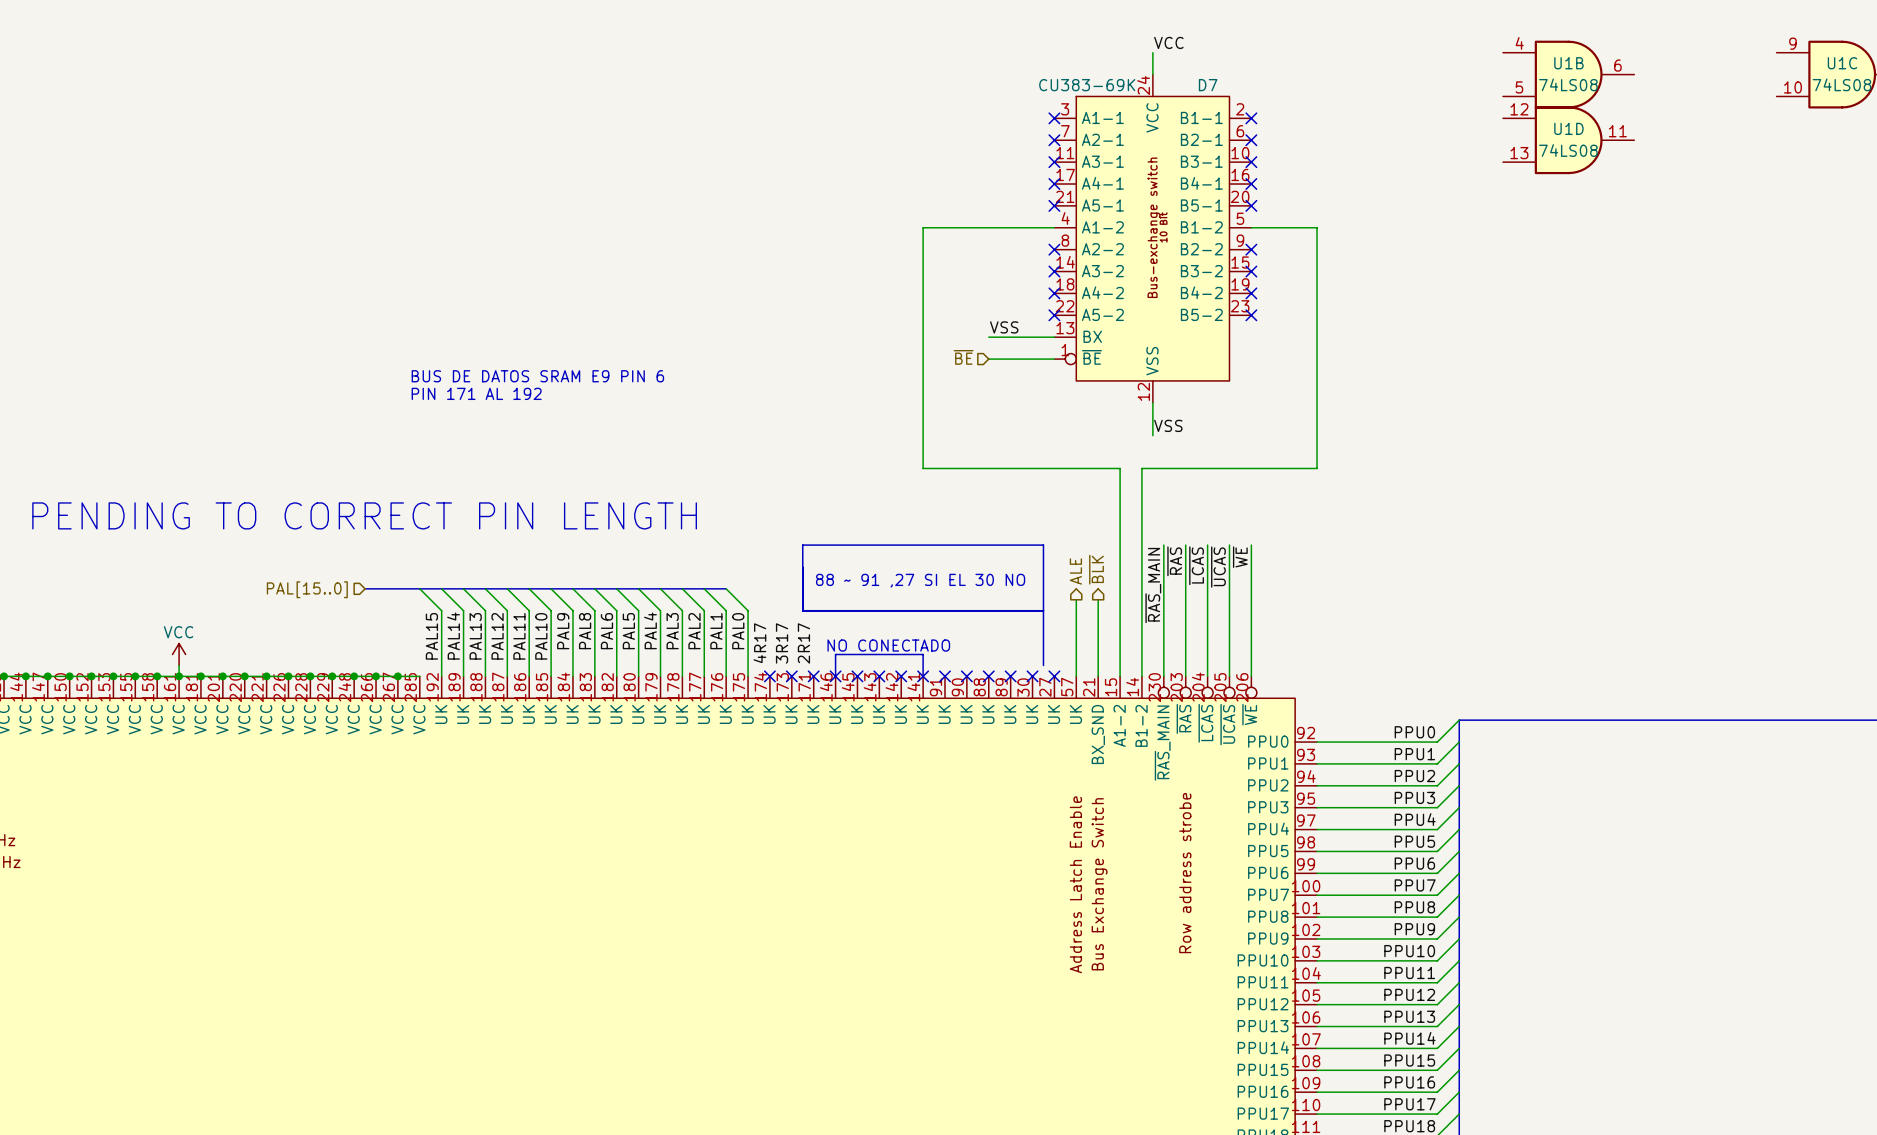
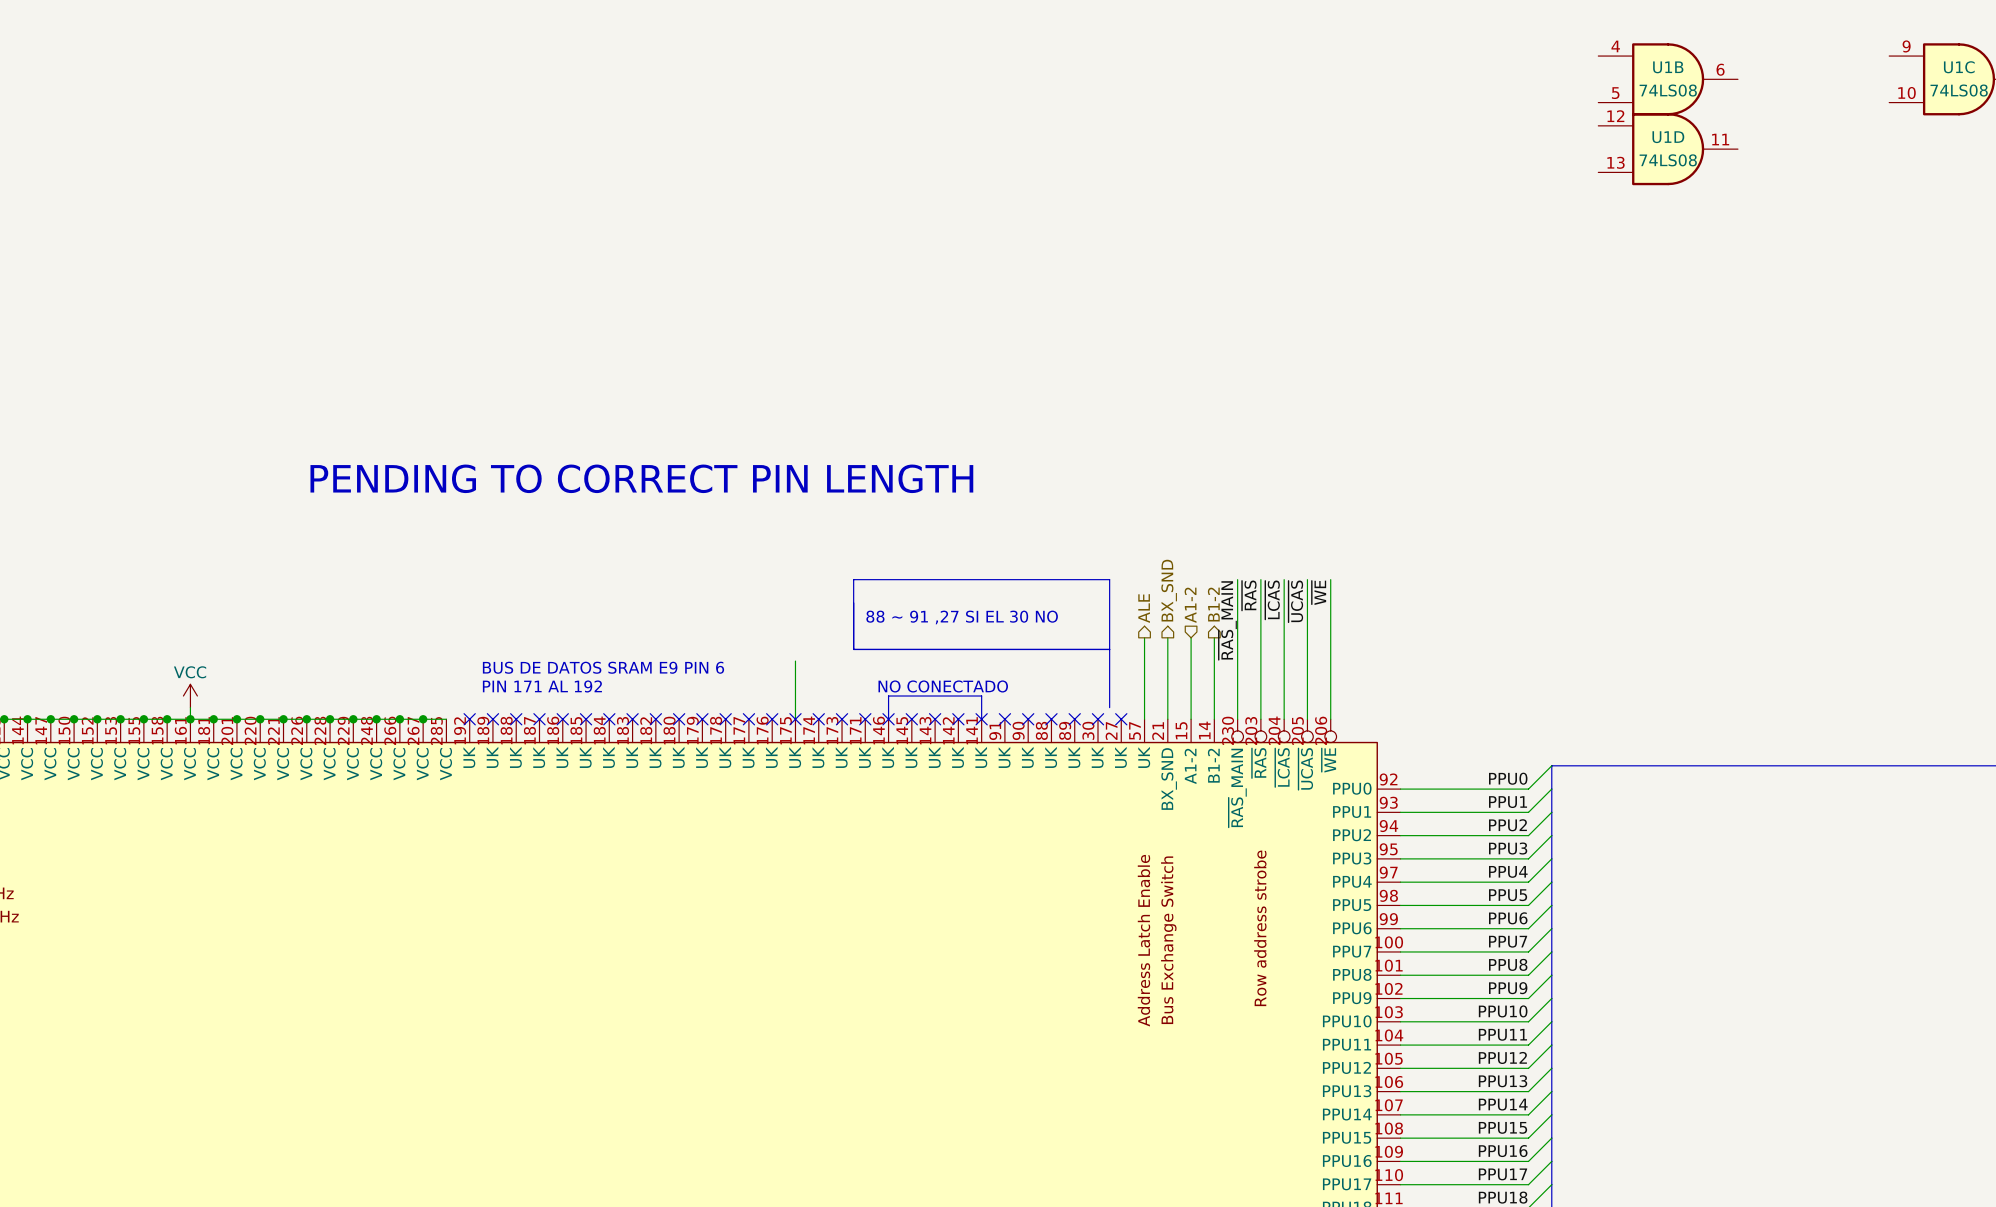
label: VCC (1168, 42) -> none
wire: (1152, 52) (1152, 74) -> none
no-connect mark: (1054, 118) -> none
no-connect mark: (1251, 118) -> none
no-connect mark: (1054, 140) -> none
no-connect mark: (1251, 140) -> none
no-connect mark: (1054, 162) -> none
no-connect mark: (1251, 162) -> none
no-connect mark: (1054, 184) -> none
no-connect mark: (1251, 184) -> none
no-connect mark: (1054, 205) -> none
no-connect mark: (1251, 205) -> none
wire: (1054, 227) (923, 227) (923, 468) (1120, 468) (1120, 599) -> none
wire: (1251, 227) (1317, 227) (1317, 468) (1141, 468) (1141, 599) -> none
D7: CU383-69K (1152, 238) -> none
no-connect mark: (1054, 249) -> none
no-connect mark: (1251, 249) -> none
no-connect mark: (1054, 271) -> none
no-connect mark: (1251, 271) -> none
no-connect mark: (1054, 293) -> none
no-connect mark: (1251, 293) -> none
no-connect mark: (1054, 315) -> none
no-connect mark: (1251, 315) -> none
label: VSS (1004, 327) -> none
wire: (988, 337) (1054, 337) -> none
hierarchical label: ~{BE} (963, 357) -> none
wire: (988, 359) (1054, 359) -> none
text: BUS DE DATOS SRAM E9 PIN 6 (537, 376) -> none
text: PIN 171 AL 192 (476, 393) -> none
wire: (1152, 402) (1152, 435) -> none
label: VSS (1168, 425) -> none
text: none -> PENDING TO CORRECT PIN LENGTH (641, 478)
text: PENDING TO CORRECT PIN LENGTH (364, 515) -> none
hierarchical label: none -> B1-2 (1213, 604)
hierarchical label: none -> A1-2 (1190, 605)
hierarchical label: ~{BLK} (1096, 569) -> BX_SND (1169, 590)
bus: (365, 588) (726, 588) -> none
wire: (419, 588) (441, 610) (441, 676) -> none
wire: (441, 588) (463, 610) (463, 676) -> none
wire: (463, 588) (485, 610) (485, 676) -> none
wire: (485, 588) (507, 610) (507, 676) -> none
wire: (507, 588) (529, 610) (529, 676) -> none
wire: (529, 588) (551, 610) (551, 676) -> none
wire: (551, 588) (572, 610) (572, 676) -> none
wire: (572, 588) (594, 610) (594, 676) -> none
wire: (594, 588) (616, 610) (616, 676) -> none
wire: (616, 588) (638, 610) (638, 676) -> none
wire: (638, 588) (660, 610) (660, 676) -> none
wire: (660, 588) (682, 610) (682, 676) -> none
wire: (682, 588) (704, 610) (704, 676) -> none
wire: (704, 588) (726, 610) (726, 676) -> none
wire: (726, 588) (748, 610) (748, 621) -> none
hierarchical label: PAL[15..0] (307, 589) -> none
text: none -> BUS DE DATOS SRAM E9 PIN 6 (603, 667)
label: PAL4 (650, 630) -> none
label: PAL9 (563, 631) -> none
label: PAL8 (585, 631) -> none
label: PAL6 (606, 631) -> none
label: PAL5 (628, 631) -> none
label: PAL3 (672, 631) -> none
label: PAL2 (694, 631) -> none
label: PAL1 (716, 631) -> none
label: PAL0 (738, 631) -> none
label: PAL15 (431, 636) -> none
label: PAL14 (453, 636) -> none
label: PAL13 (475, 636) -> none
label: PAL12 (497, 636) -> none
label: PAL11 (519, 636) -> none
label: PAL10 (541, 636) -> none
label: 4R17 (759, 643) -> none
label: 3R17 (782, 643) -> none
label: 2R17 (803, 643) -> none
text: none -> PIN 171 AL 192 (542, 686)
no-connect mark: none -> (469, 719)
no-connect mark: none -> (492, 719)
no-connect mark: none -> (516, 719)
no-connect mark: none -> (539, 719)
no-connect mark: none -> (562, 719)
no-connect mark: none -> (586, 719)
no-connect mark: none -> (609, 719)
no-connect mark: none -> (632, 719)
no-connect mark: none -> (655, 719)
no-connect mark: none -> (679, 719)
no-connect mark: none -> (702, 719)
no-connect mark: none -> (725, 719)
no-connect mark: none -> (748, 719)
no-connect mark: none -> (772, 719)
no-connect mark: none -> (795, 719)

